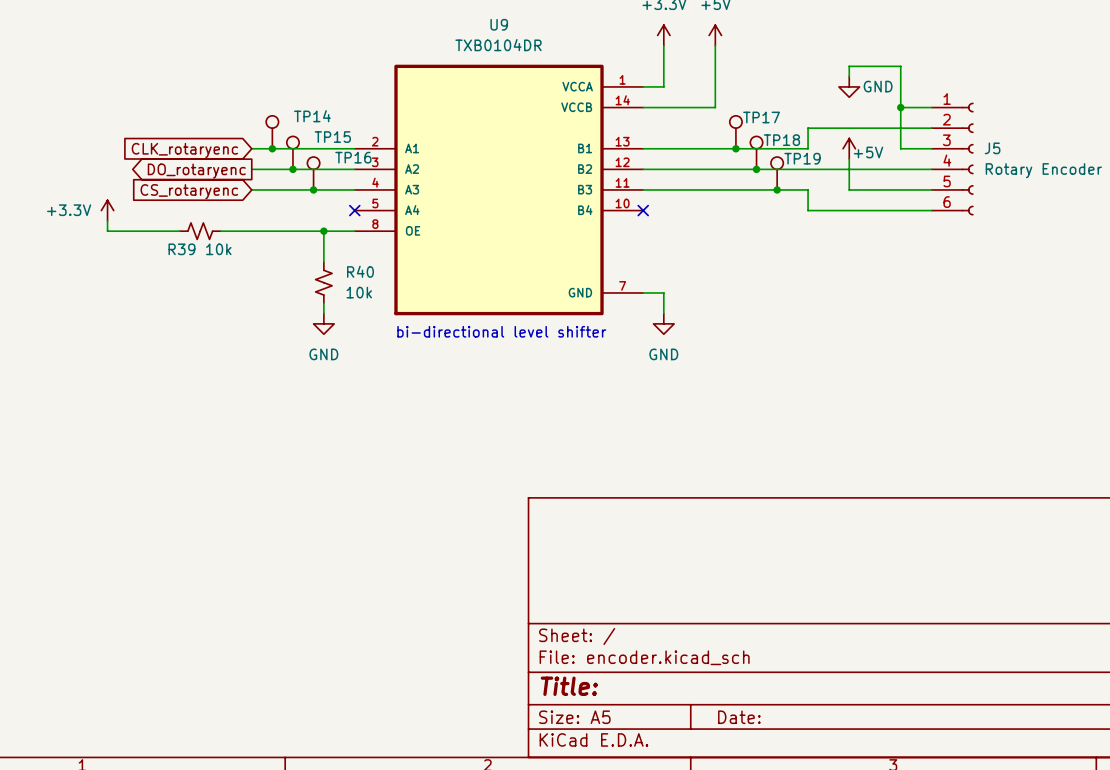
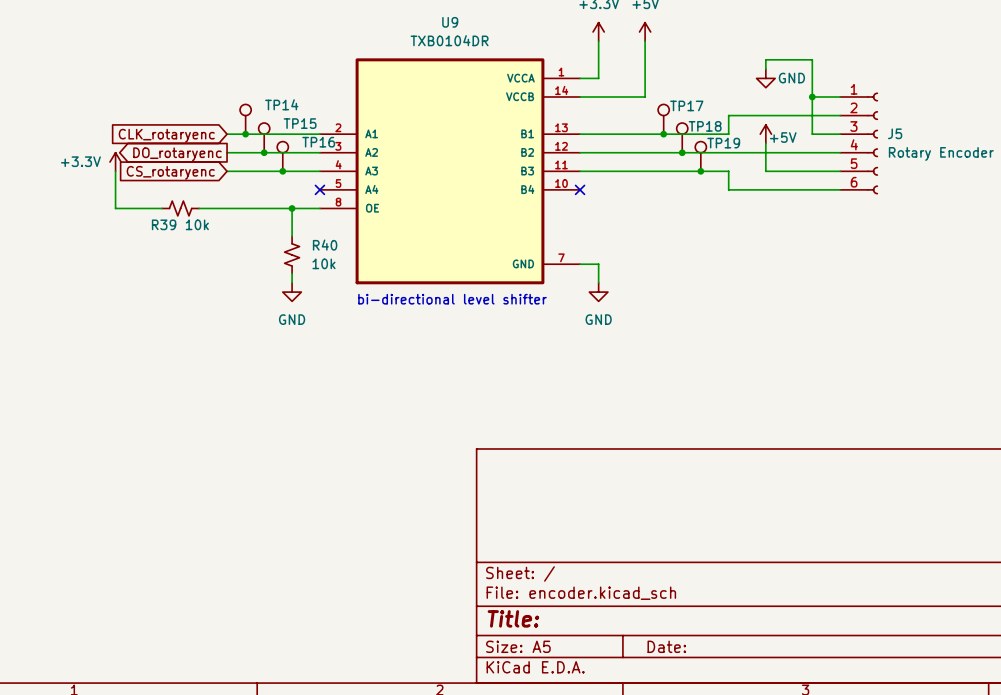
power symbol position: +3.3V (107, 210) -> +3.3V (115, 162)
wire: (107, 220) (107, 231) (128, 231) -> (115, 171) (115, 208)

